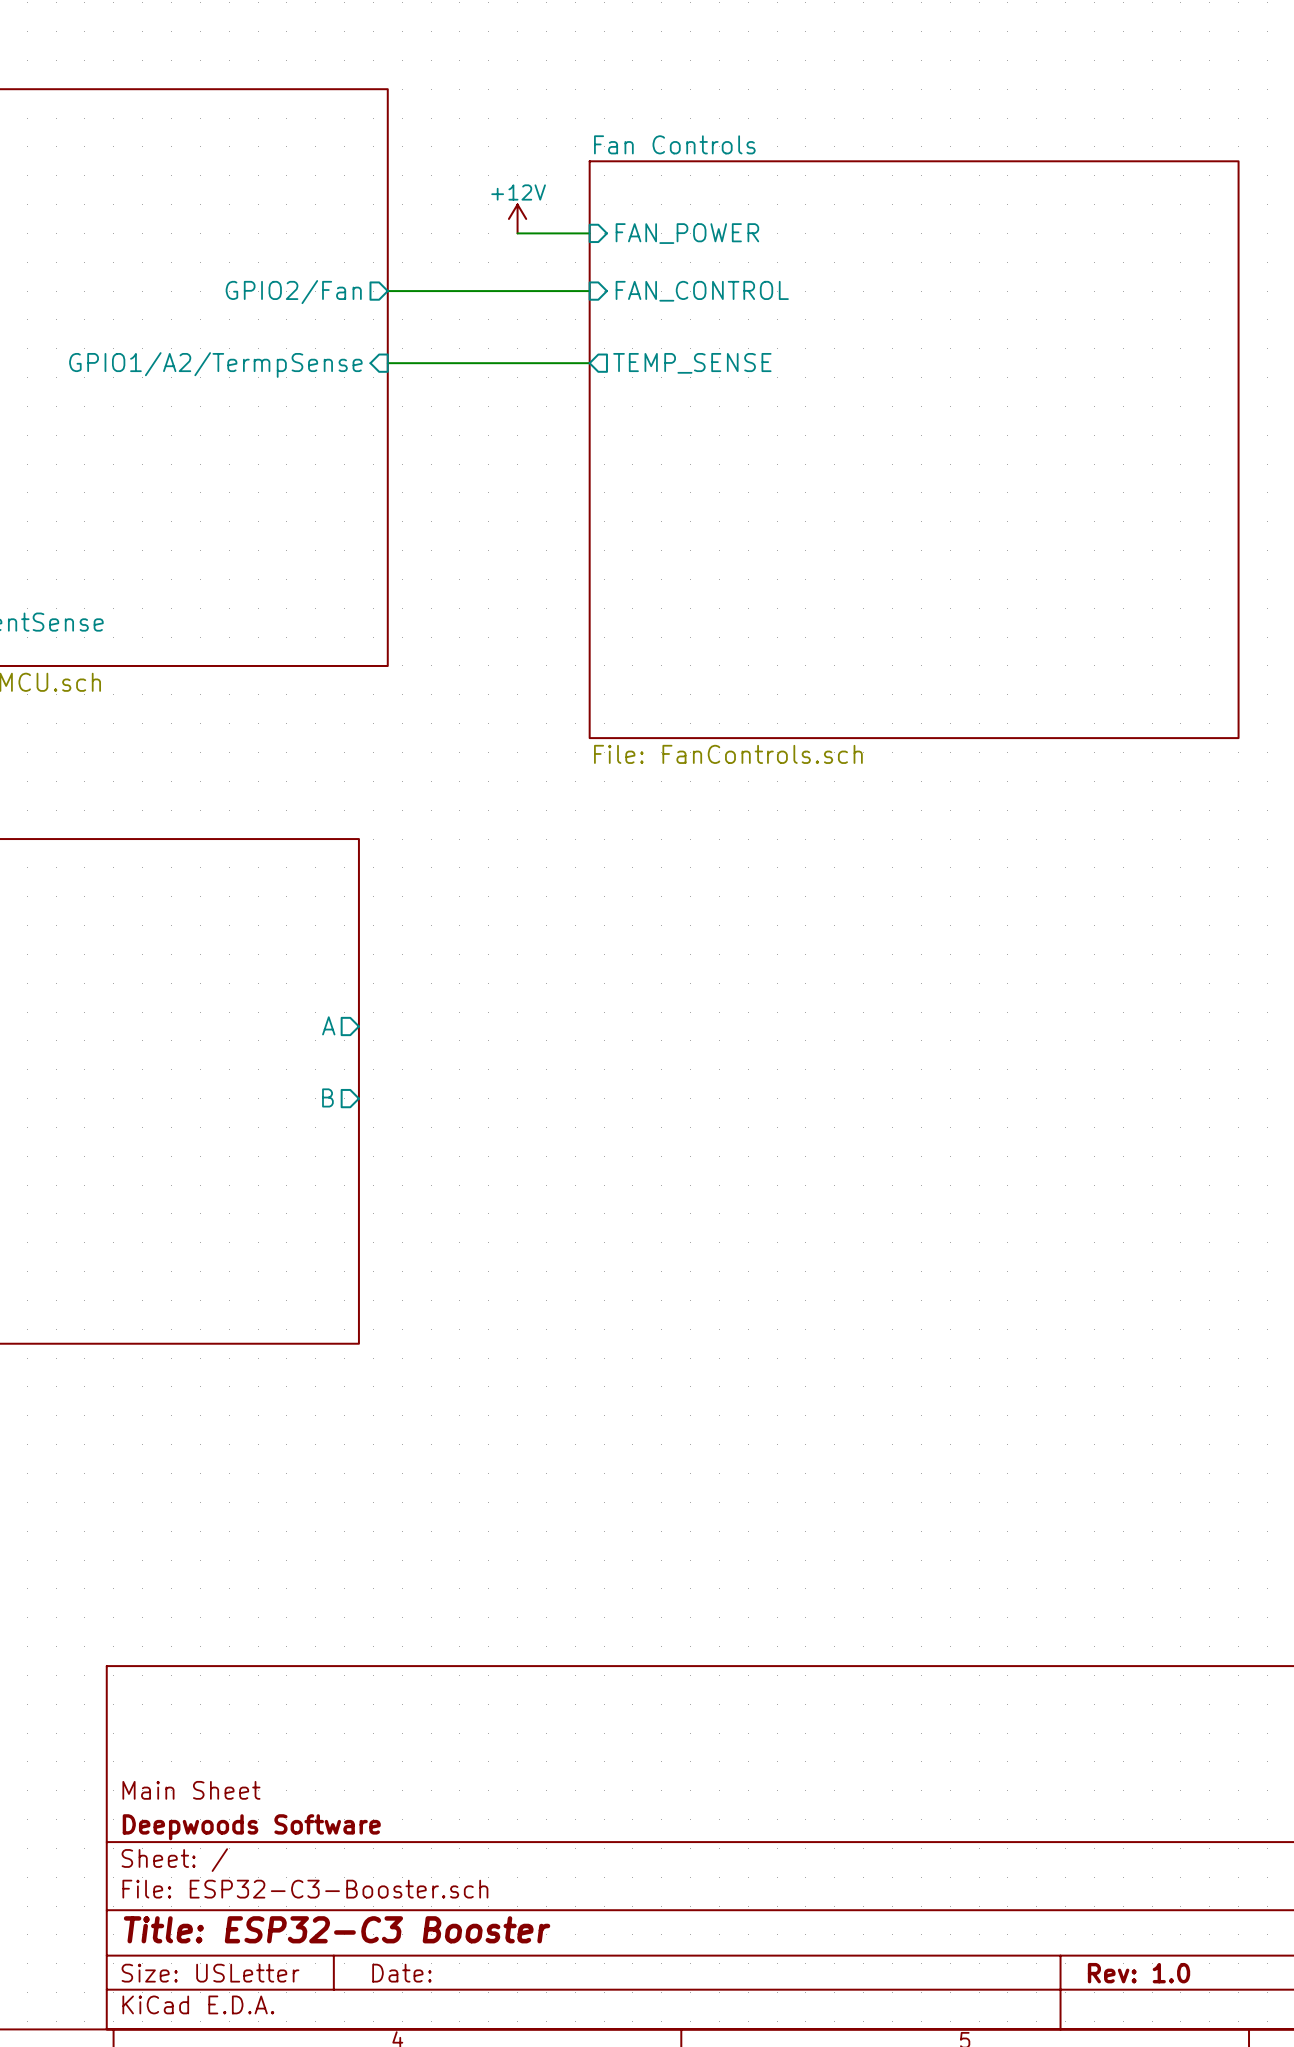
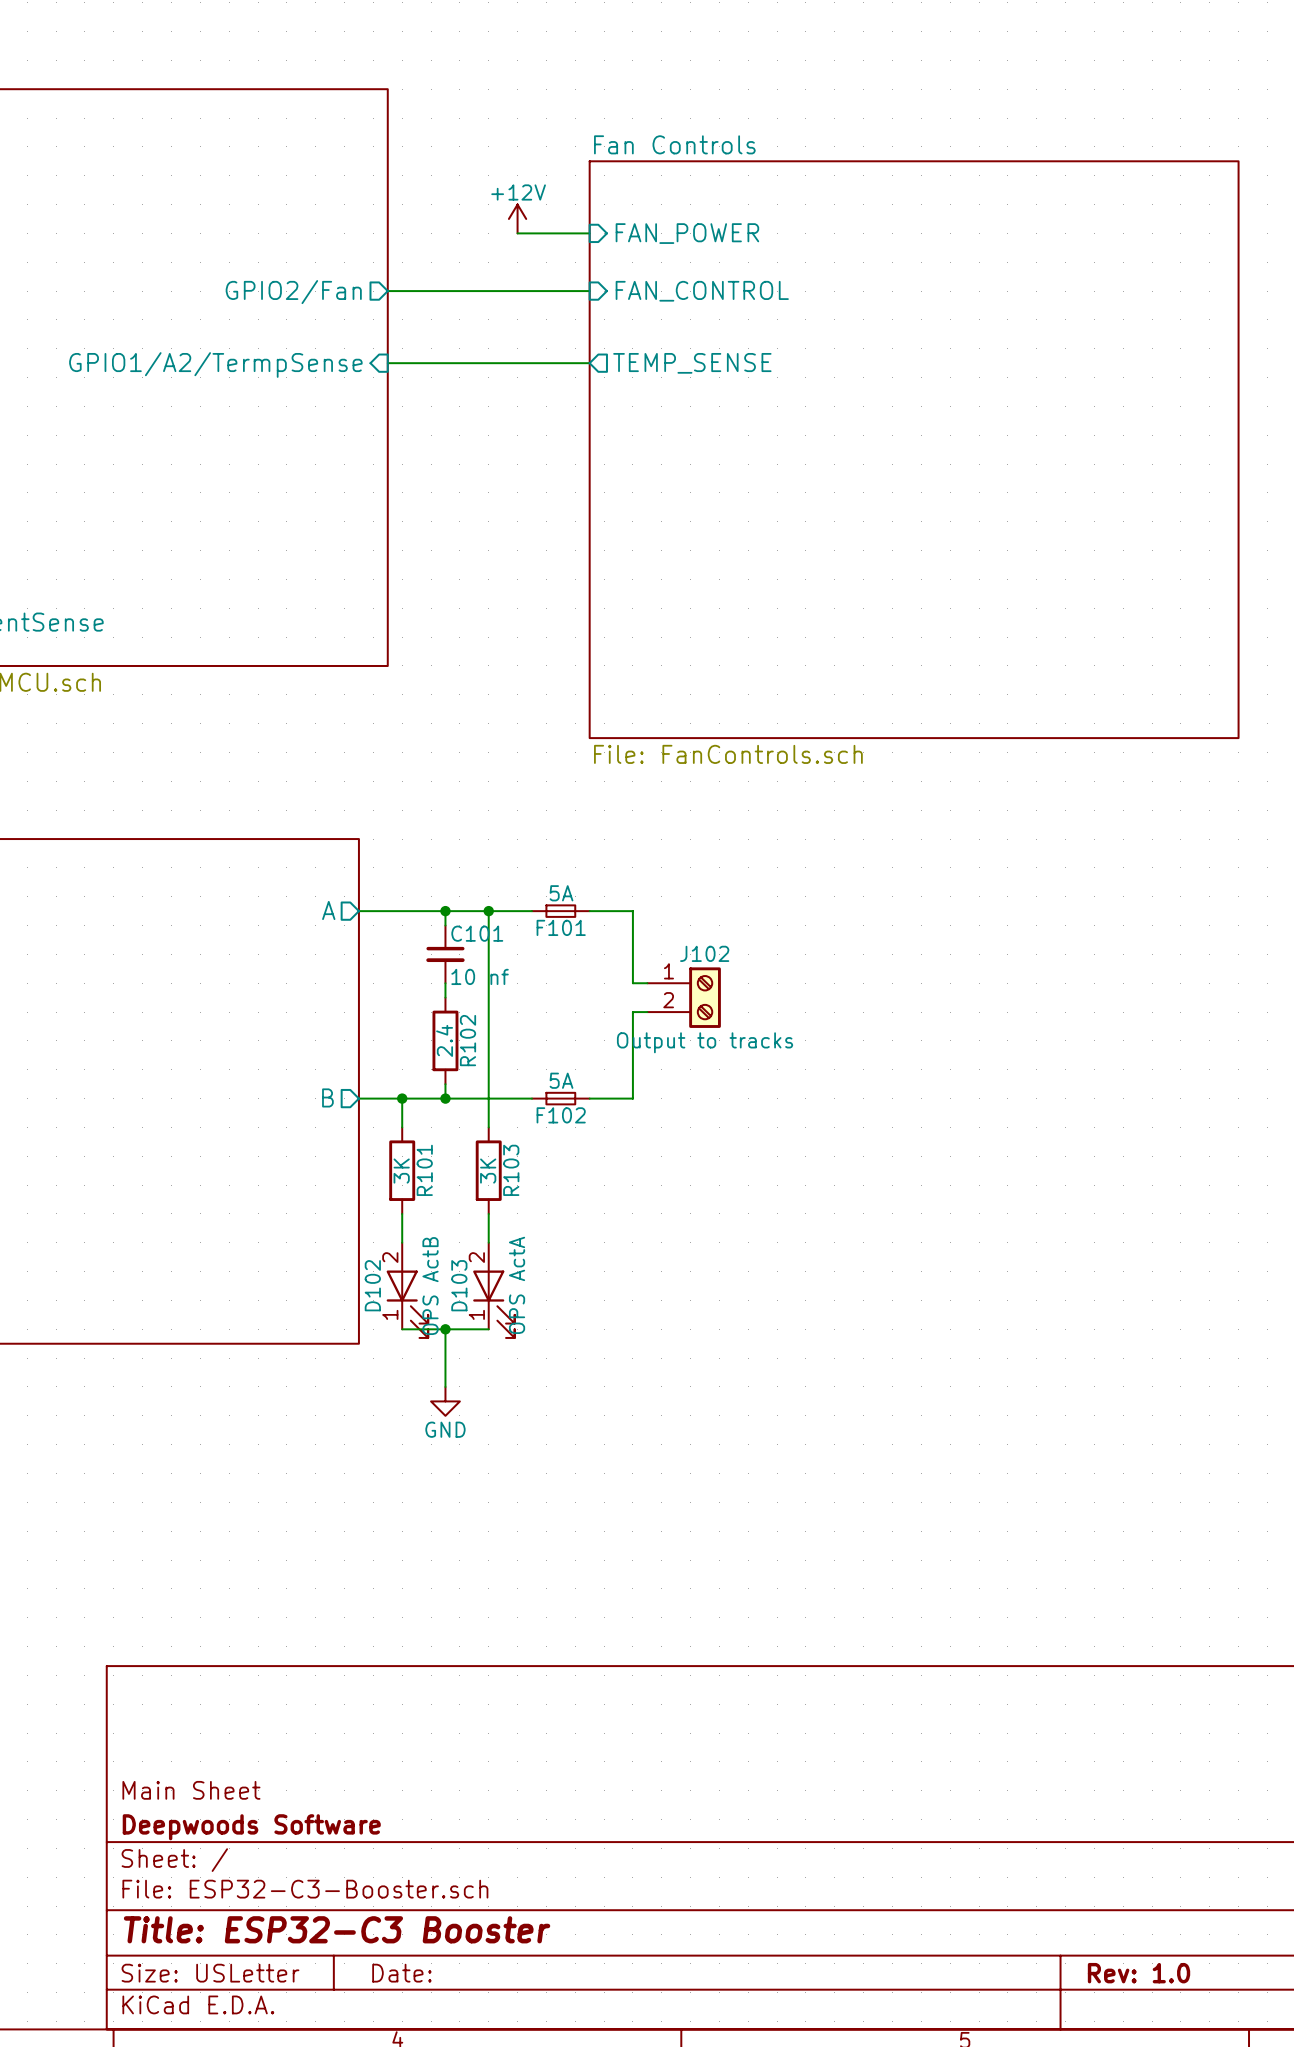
wire: none -> (358, 911) (531, 911)
wire: none -> (445, 911) (445, 925)
junction: none -> (445, 911)
wire: none -> (488, 911) (488, 1127)
junction: none -> (488, 911)
F101: none -> 5A (560, 911)
wire: none -> (589, 911) (632, 911) (632, 983) (647, 983)
C101: none -> 10 nf (445, 954)
wire: none -> (445, 983) (445, 997)
J102: none -> Output to tracks (684, 997)
wire: none -> (647, 1012) (632, 1012) (632, 1098) (589, 1098)
sheet pin position: A (328, 1025) -> A (328, 910)
R102: none -> 2.4 (445, 1040)
wire: none -> (445, 1084) (445, 1098)
wire: none -> (358, 1098) (531, 1098)
wire: none -> (402, 1098) (402, 1127)
junction: none -> (402, 1098)
junction: none -> (445, 1098)
F102: none -> 5A (560, 1098)
R101: none -> 3K (402, 1170)
R103: none -> 3K (488, 1170)
wire: none -> (402, 1213) (402, 1242)
wire: none -> (488, 1213) (488, 1242)
D102: none -> OPS ActB (407, 1290)
D103: none -> OPS ActA (493, 1290)
wire: none -> (402, 1329) (488, 1329)
wire: none -> (445, 1329) (445, 1386)
junction: none -> (445, 1329)
power symbol: none -> GND (445, 1401)

